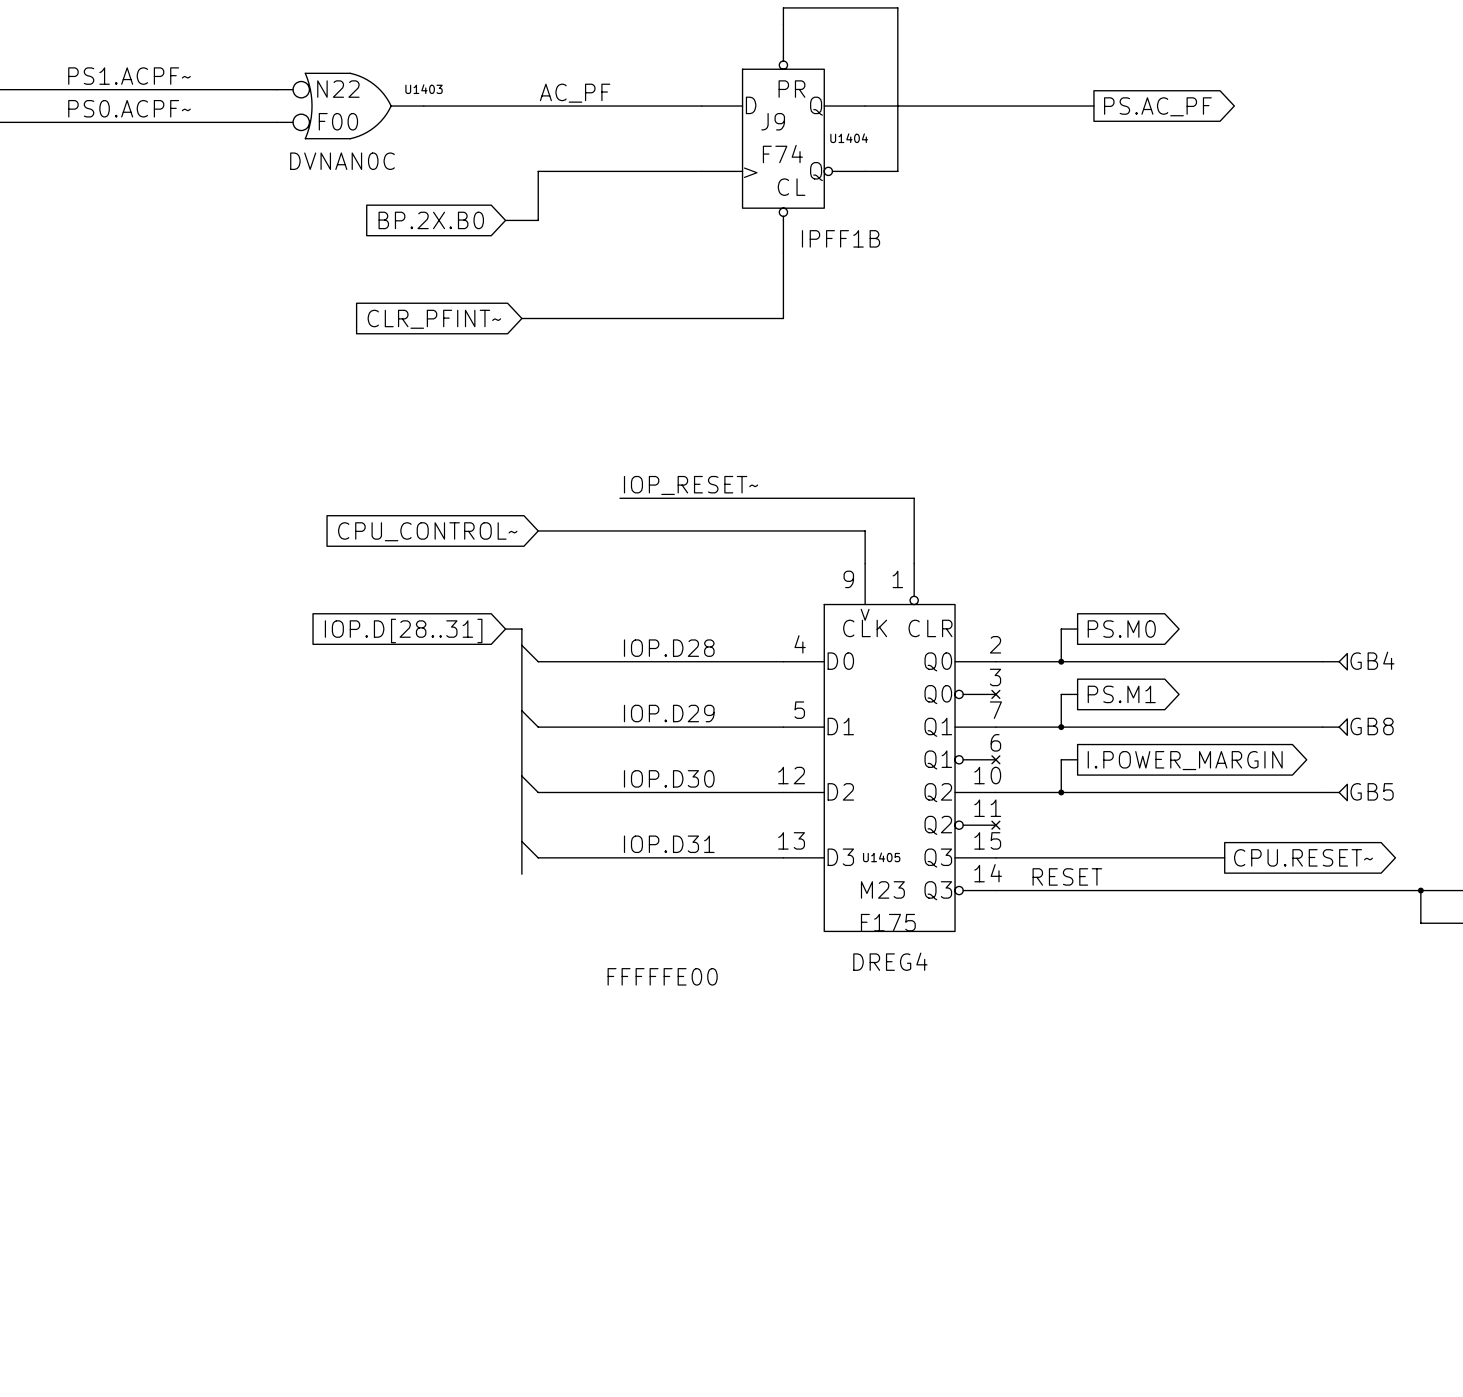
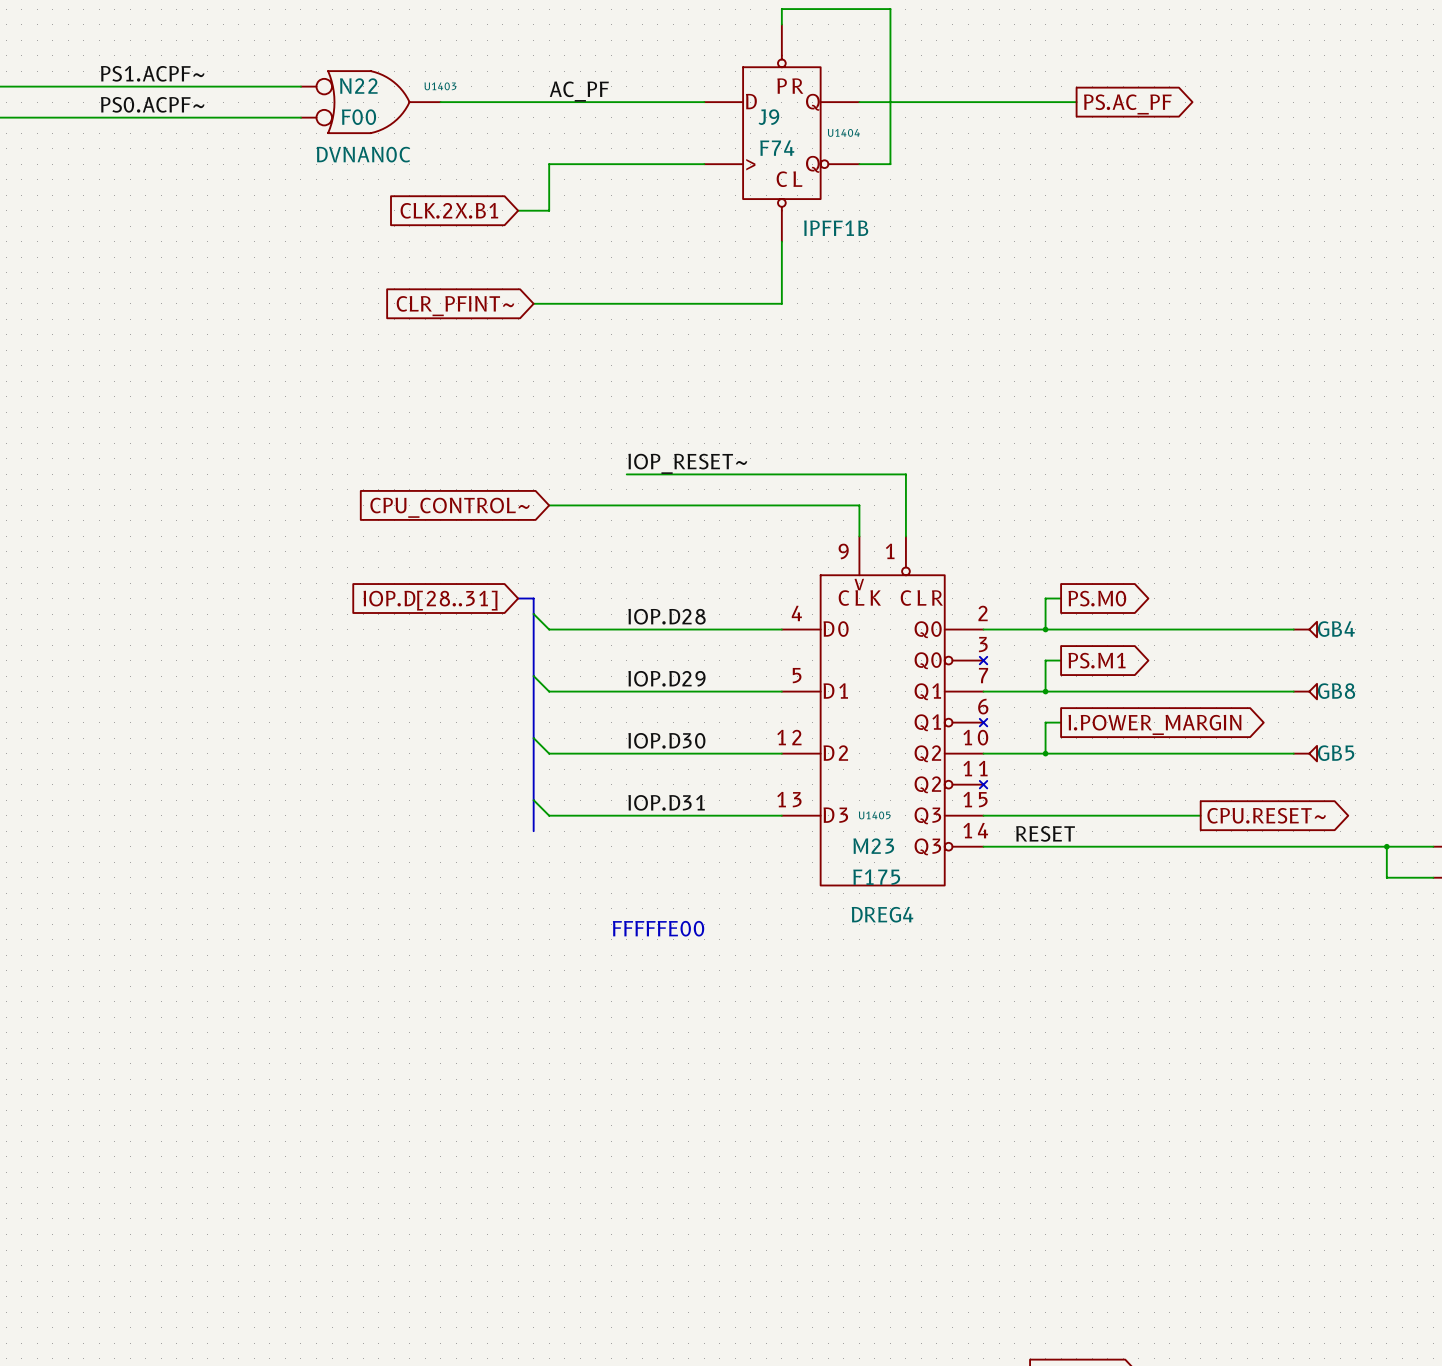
global label: BP.2X.B0 (431, 220) -> CLK.2X.B1 (449, 210)

